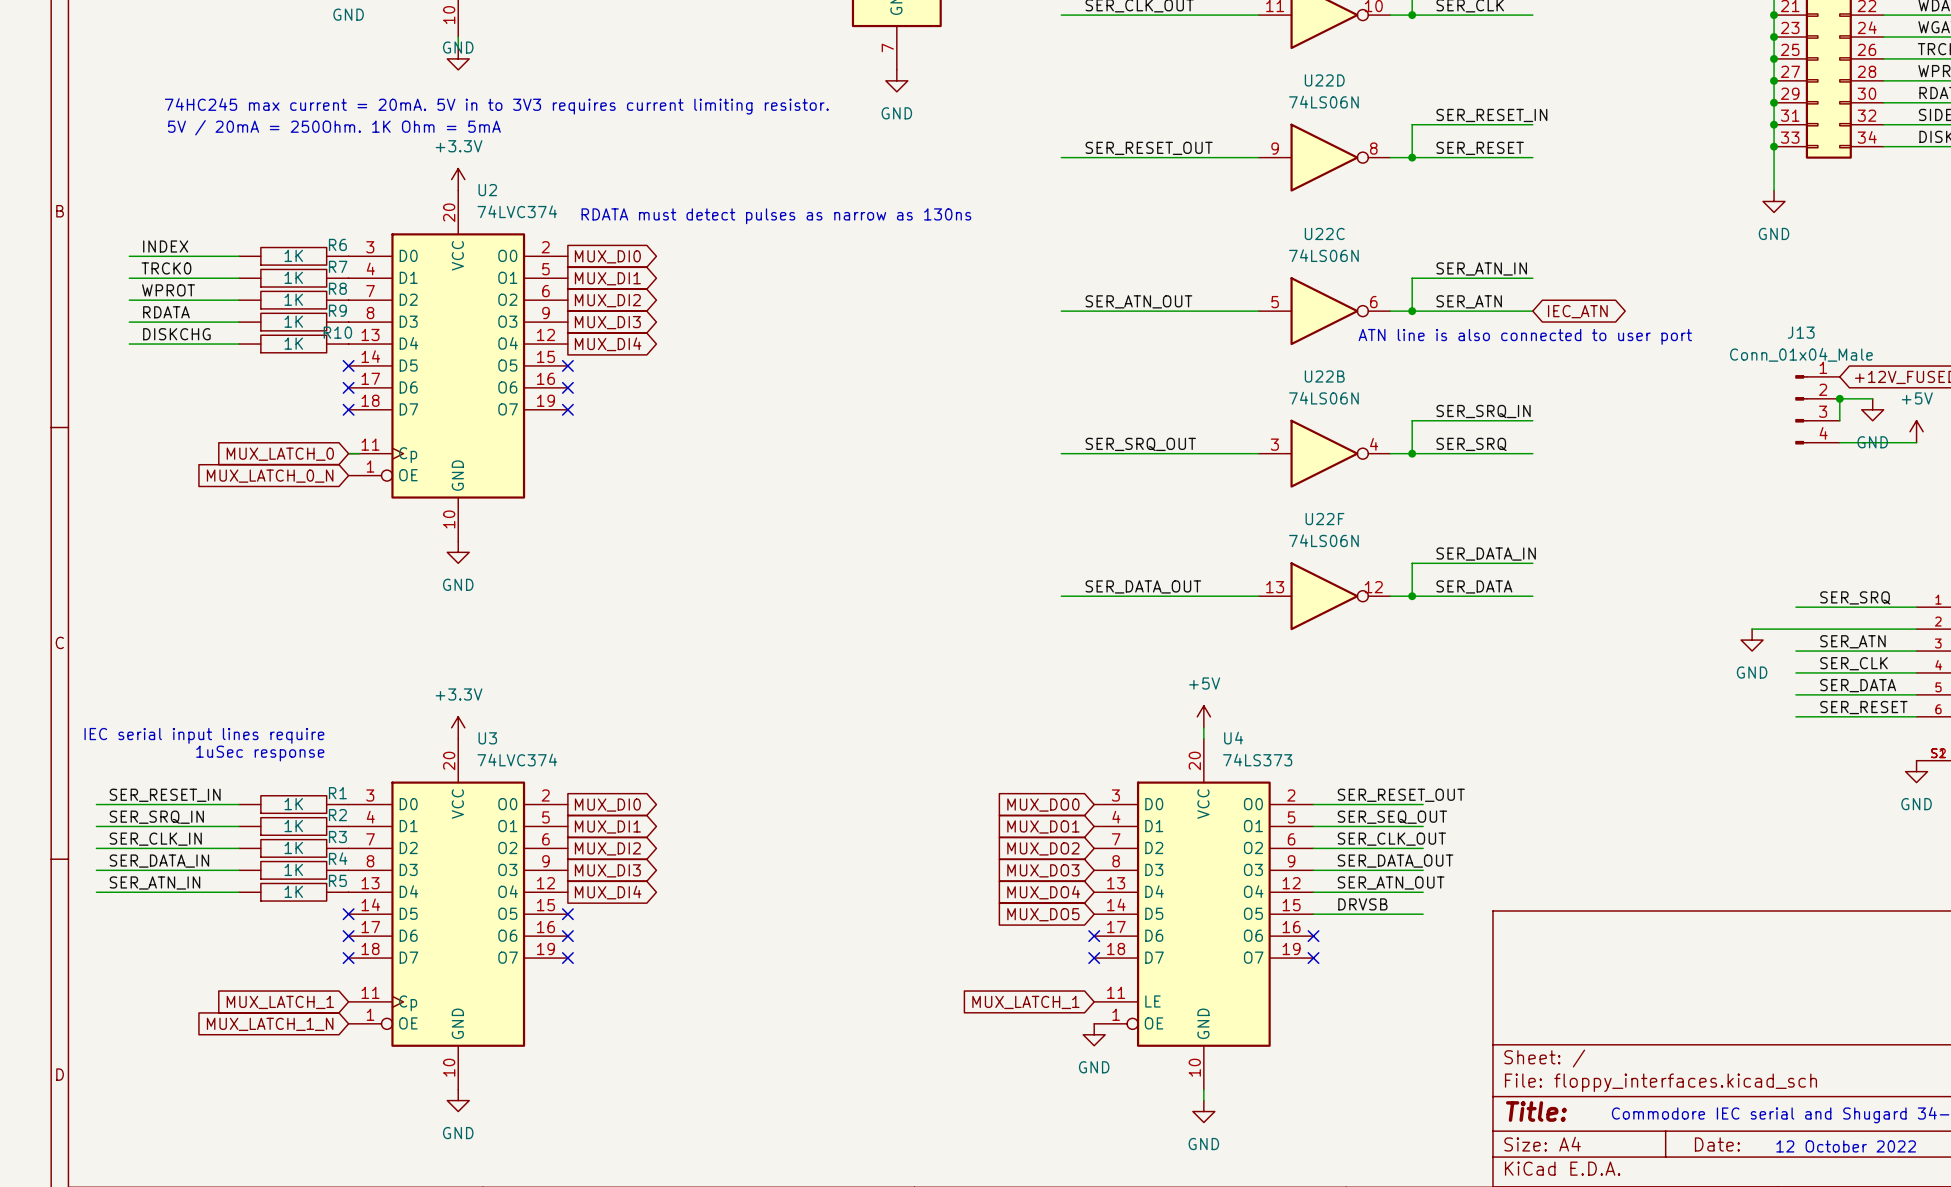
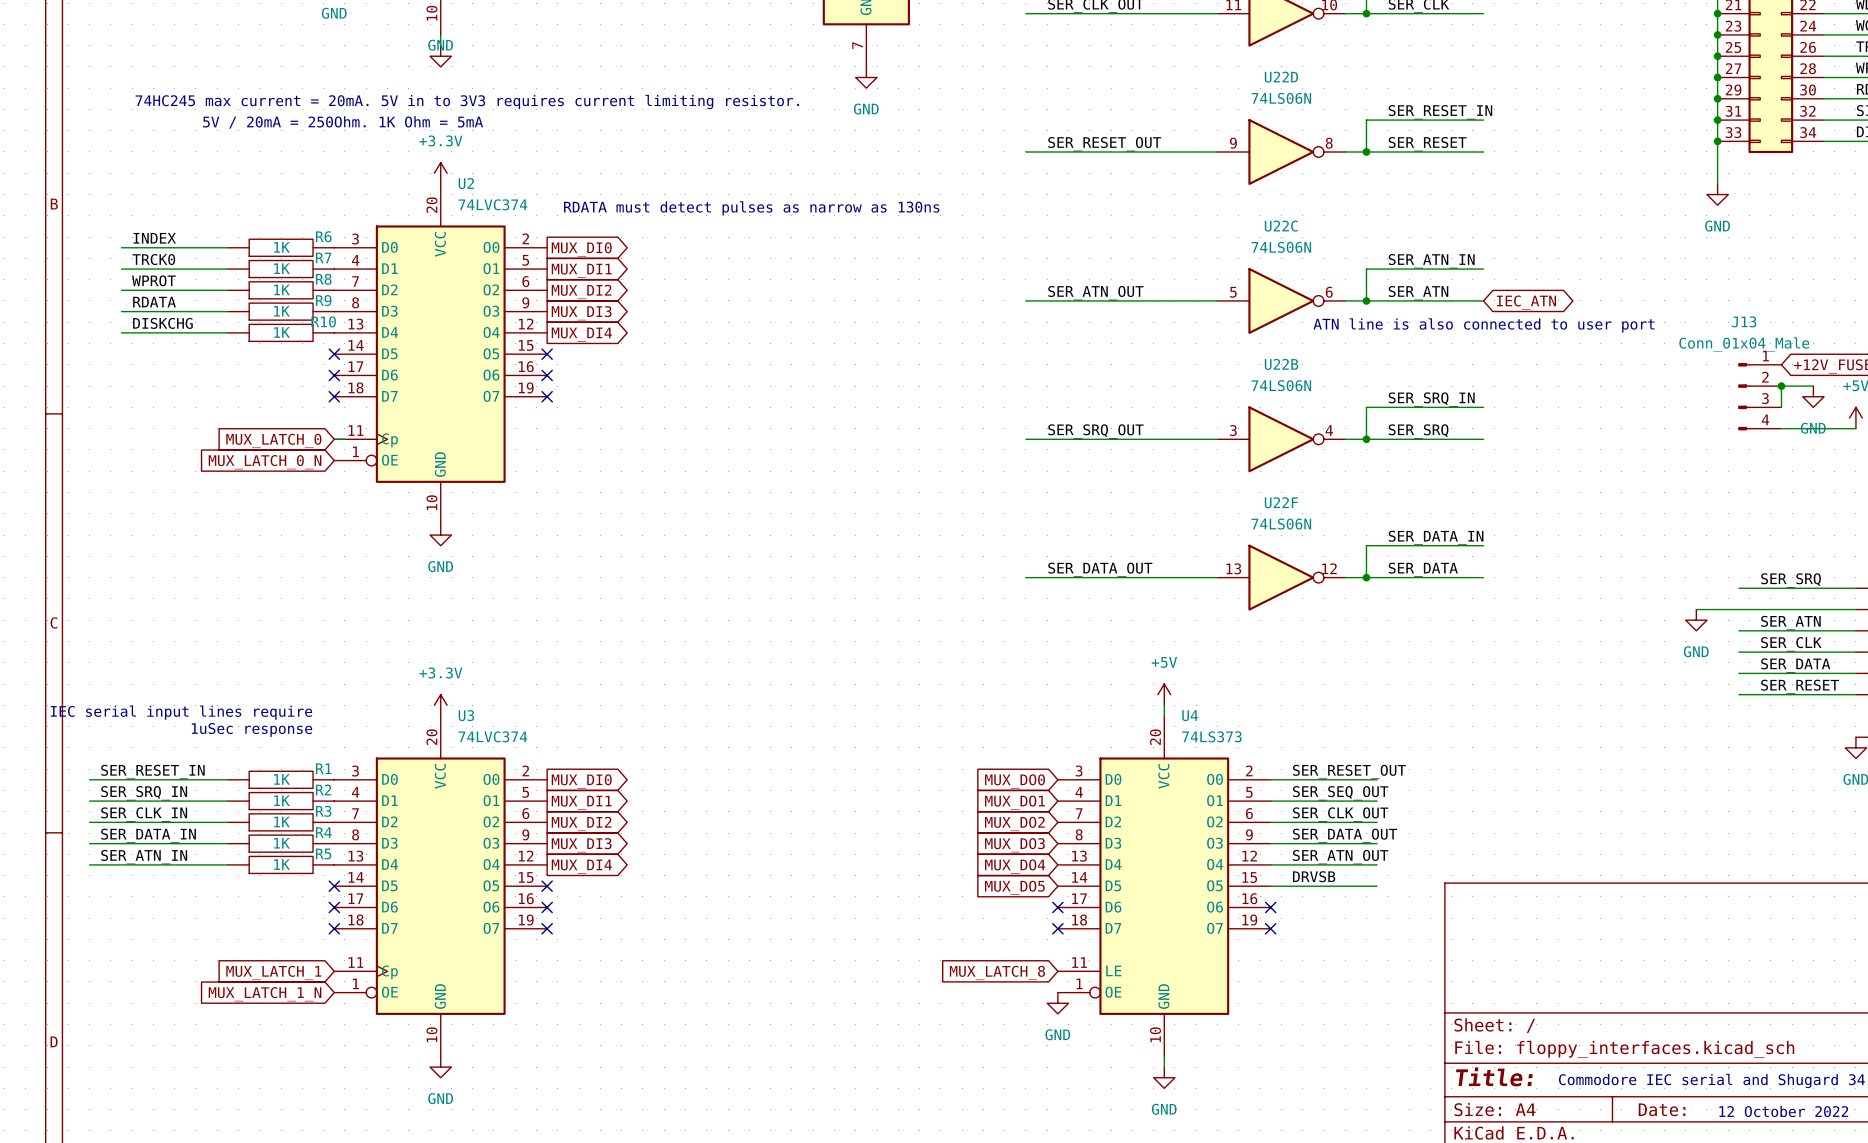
global label: MUX_LATCH_1 (1025, 1002) -> MUX_LATCH_8 (997, 972)

